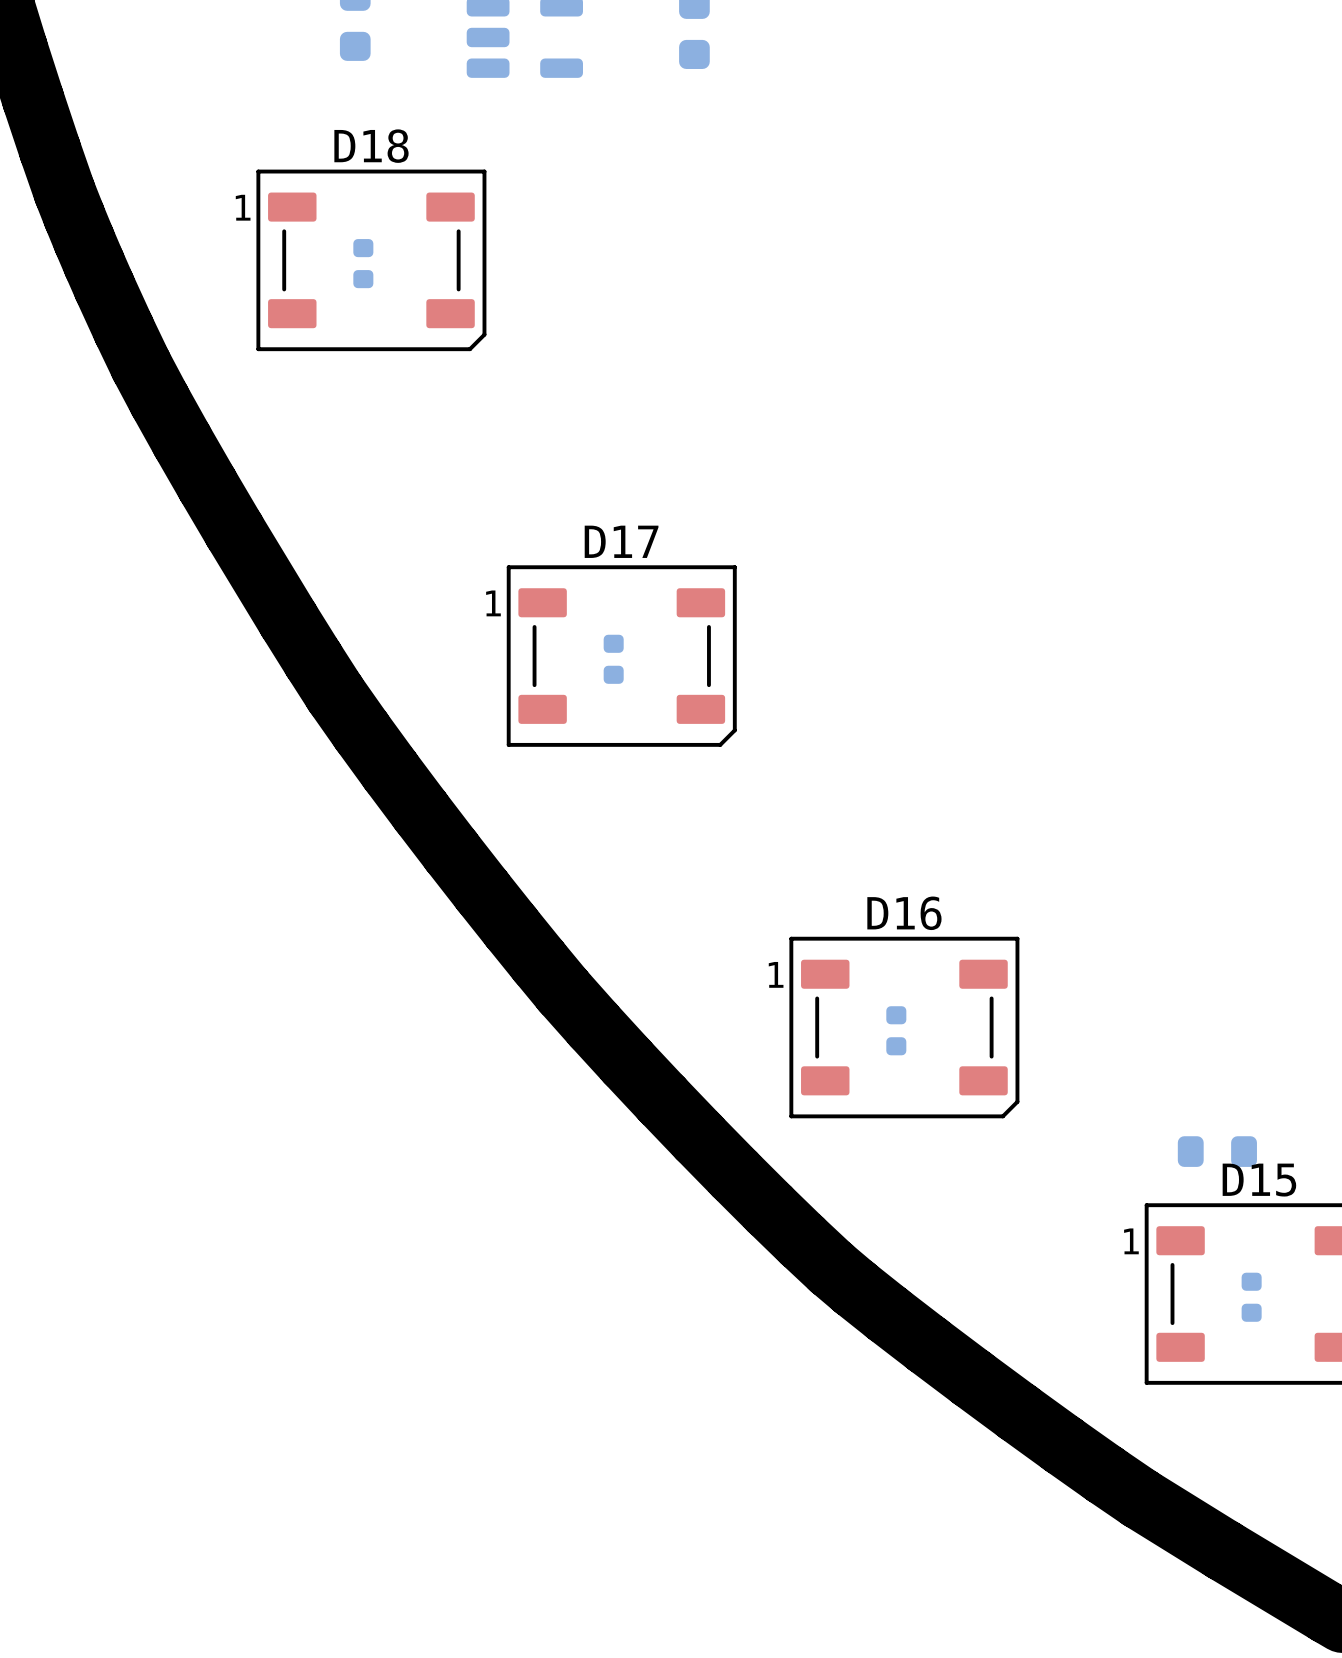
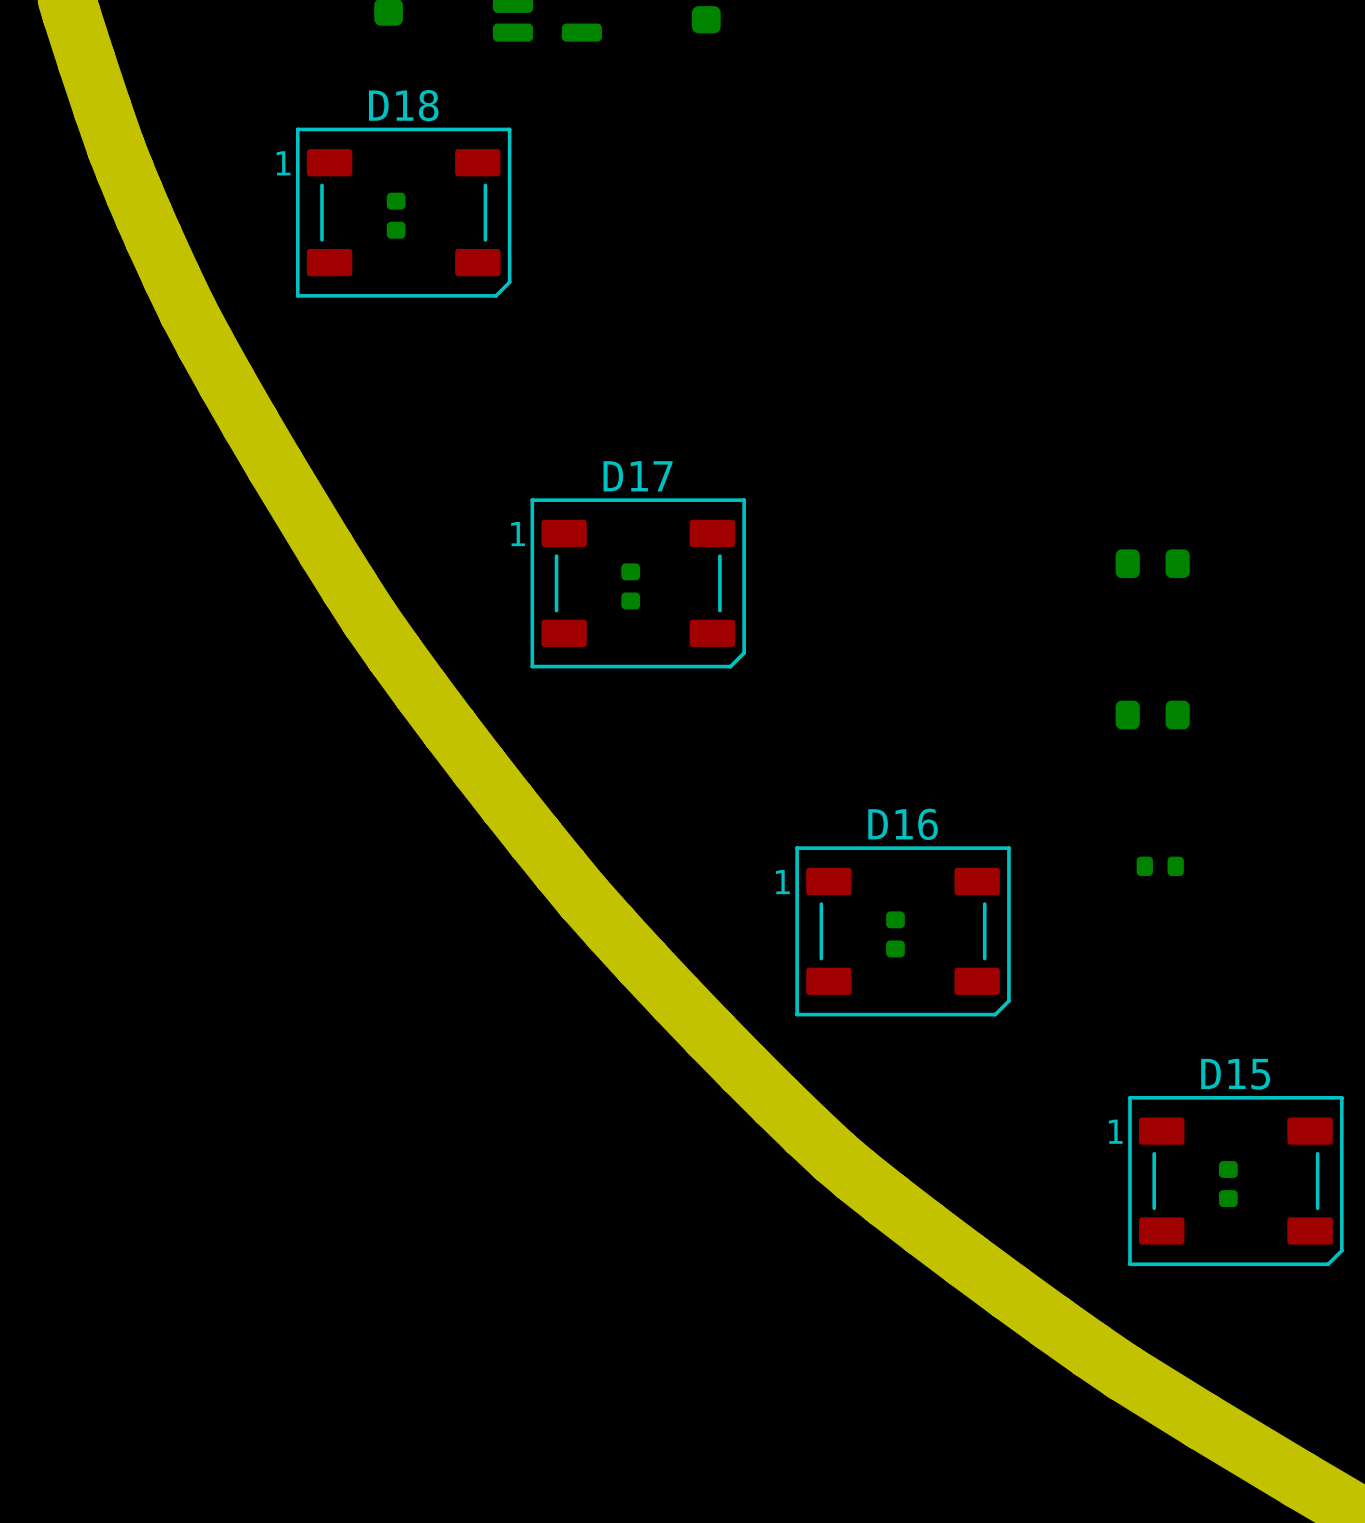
part: none -> (1152, 563)
part: none -> (1152, 715)
part: none -> (1160, 866)
part: (1217, 1151) -> none

